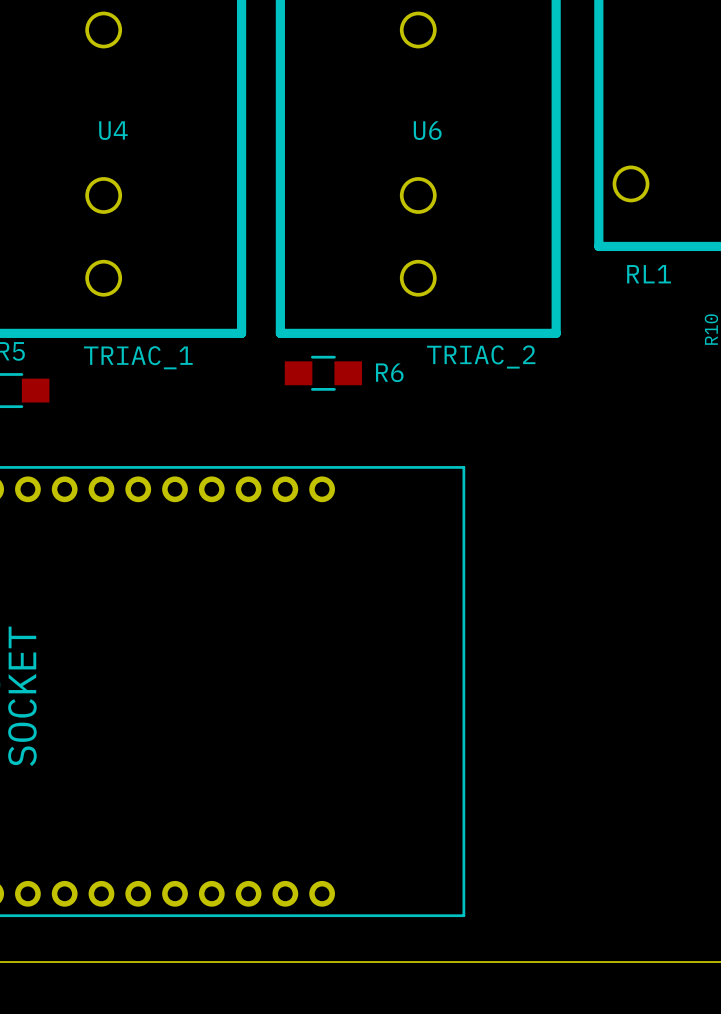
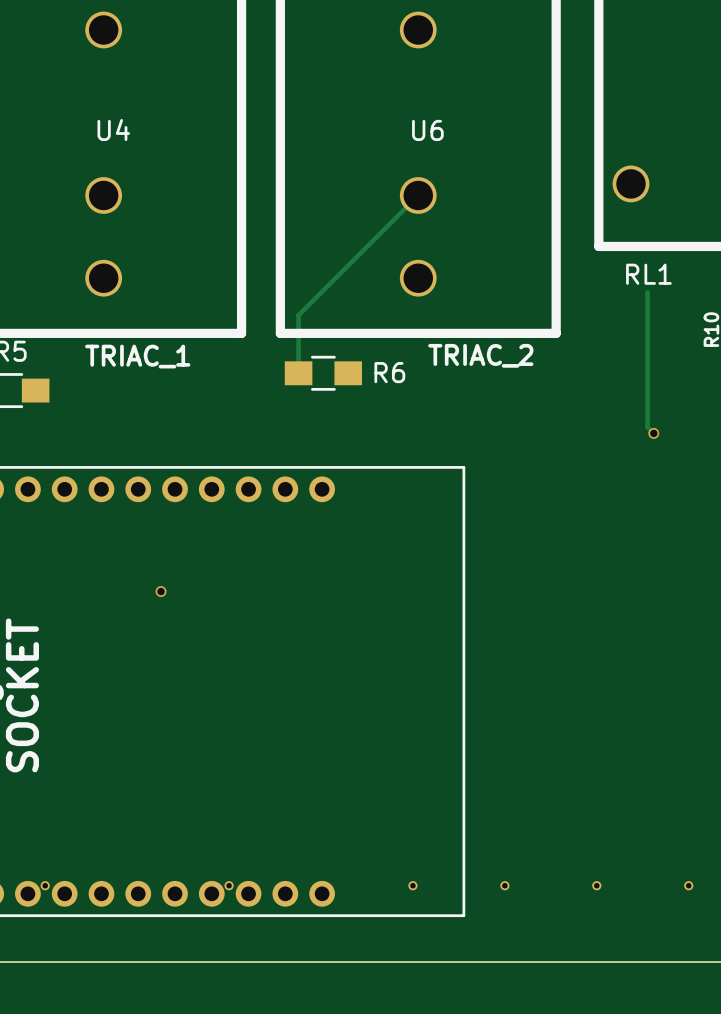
track: none -> (418, 195) (298, 315) (298, 373)
track: none -> (647, 292) (647, 427) (653, 433)
via: none -> (653, 433)
via: none -> (161, 591)
part: none -> (45, 885)
part: none -> (229, 885)
part: none -> (412, 885)
part: none -> (504, 885)
part: none -> (596, 885)
part: none -> (688, 885)

